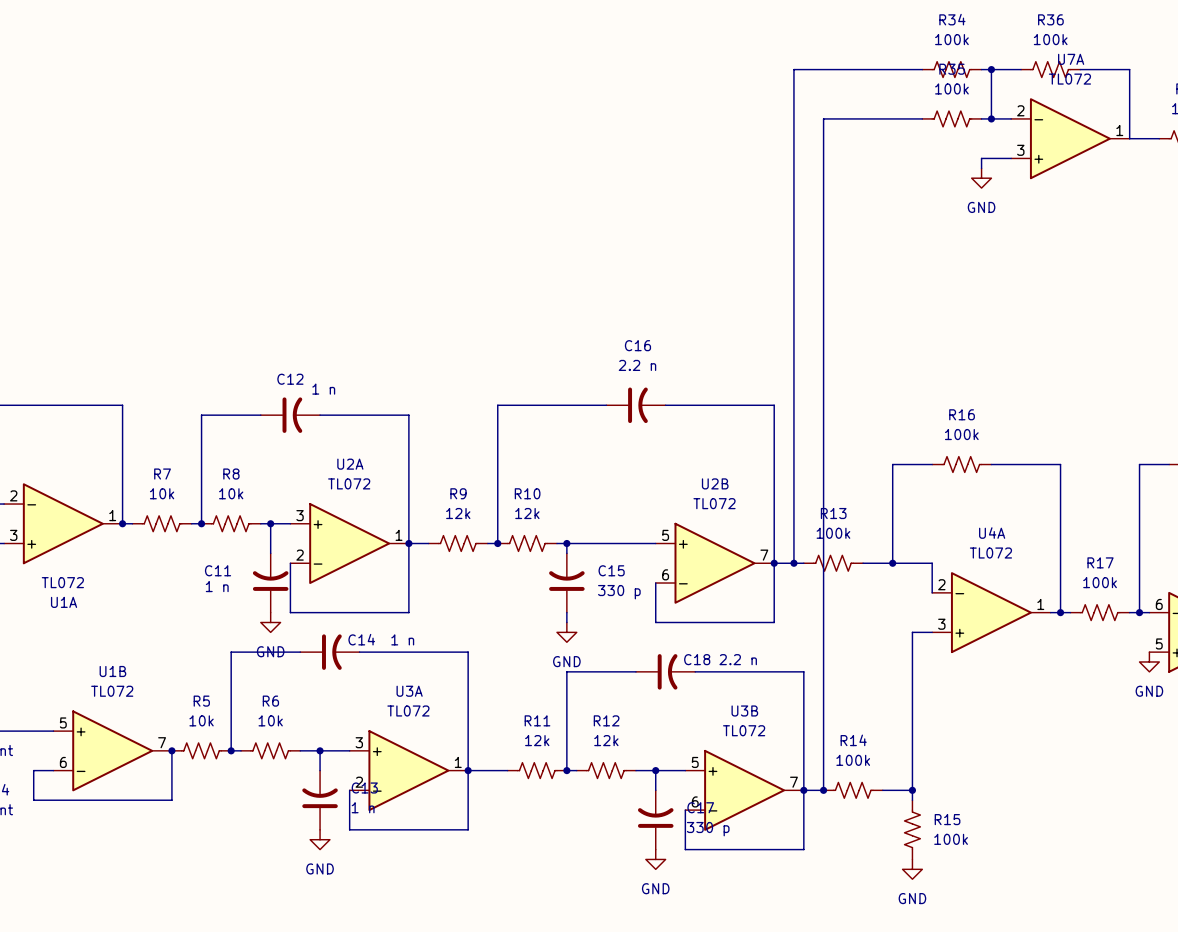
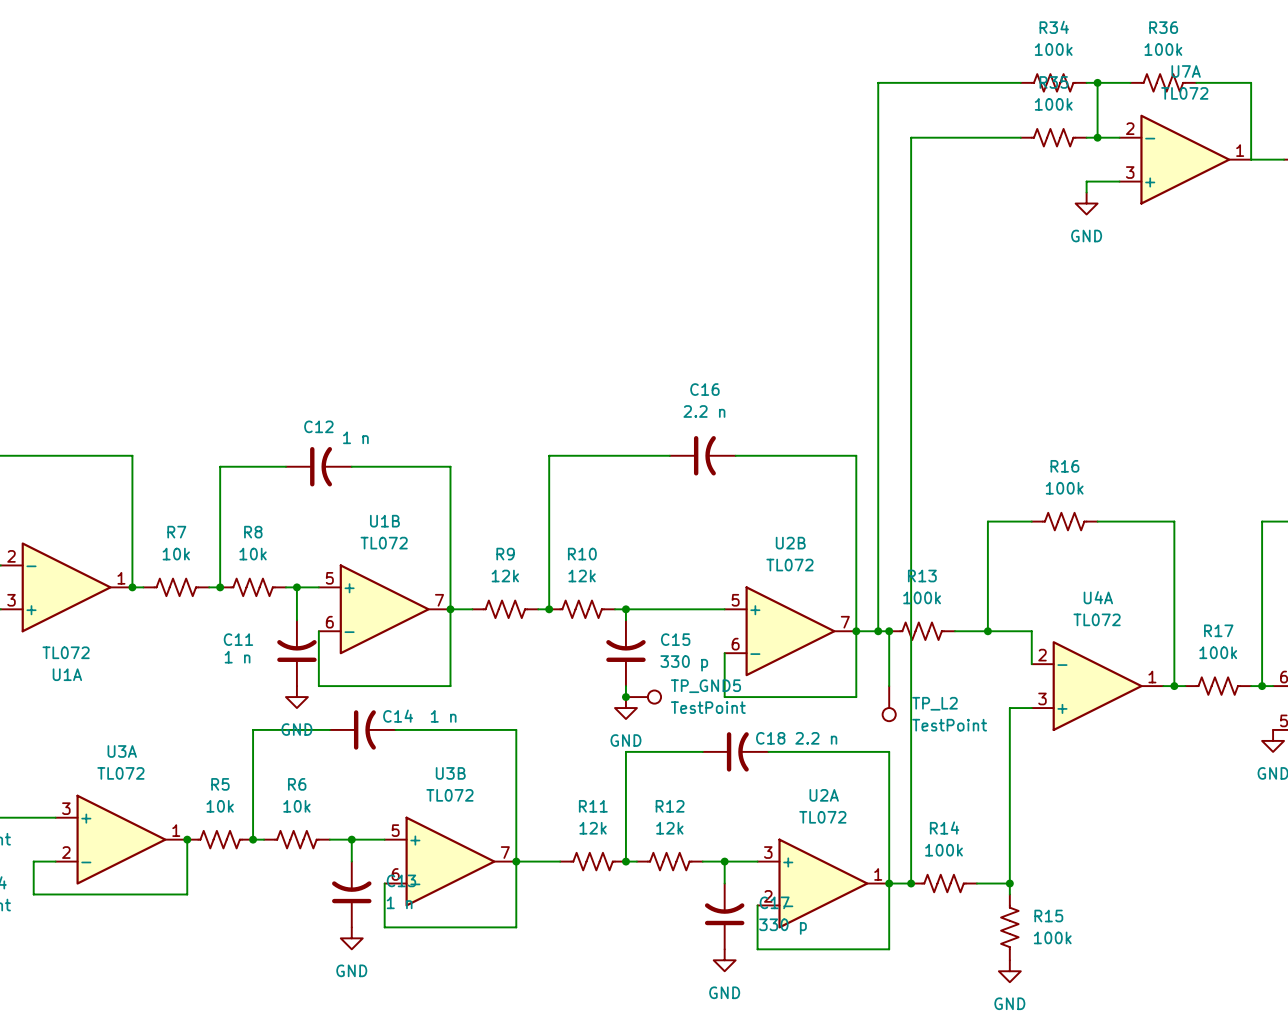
U2A position: (349, 543) -> (823, 883)
wire: none -> (889, 631) (889, 686)
junction: none -> (889, 631)
junction: none -> (625, 697)
TP_GND5: none -> TestPoint (643, 697)
TP_L2: none -> TestPoint (889, 703)
U1B position: (112, 750) -> (384, 609)
U3A position: (408, 770) -> (121, 839)
U3B position: (744, 790) -> (450, 861)

